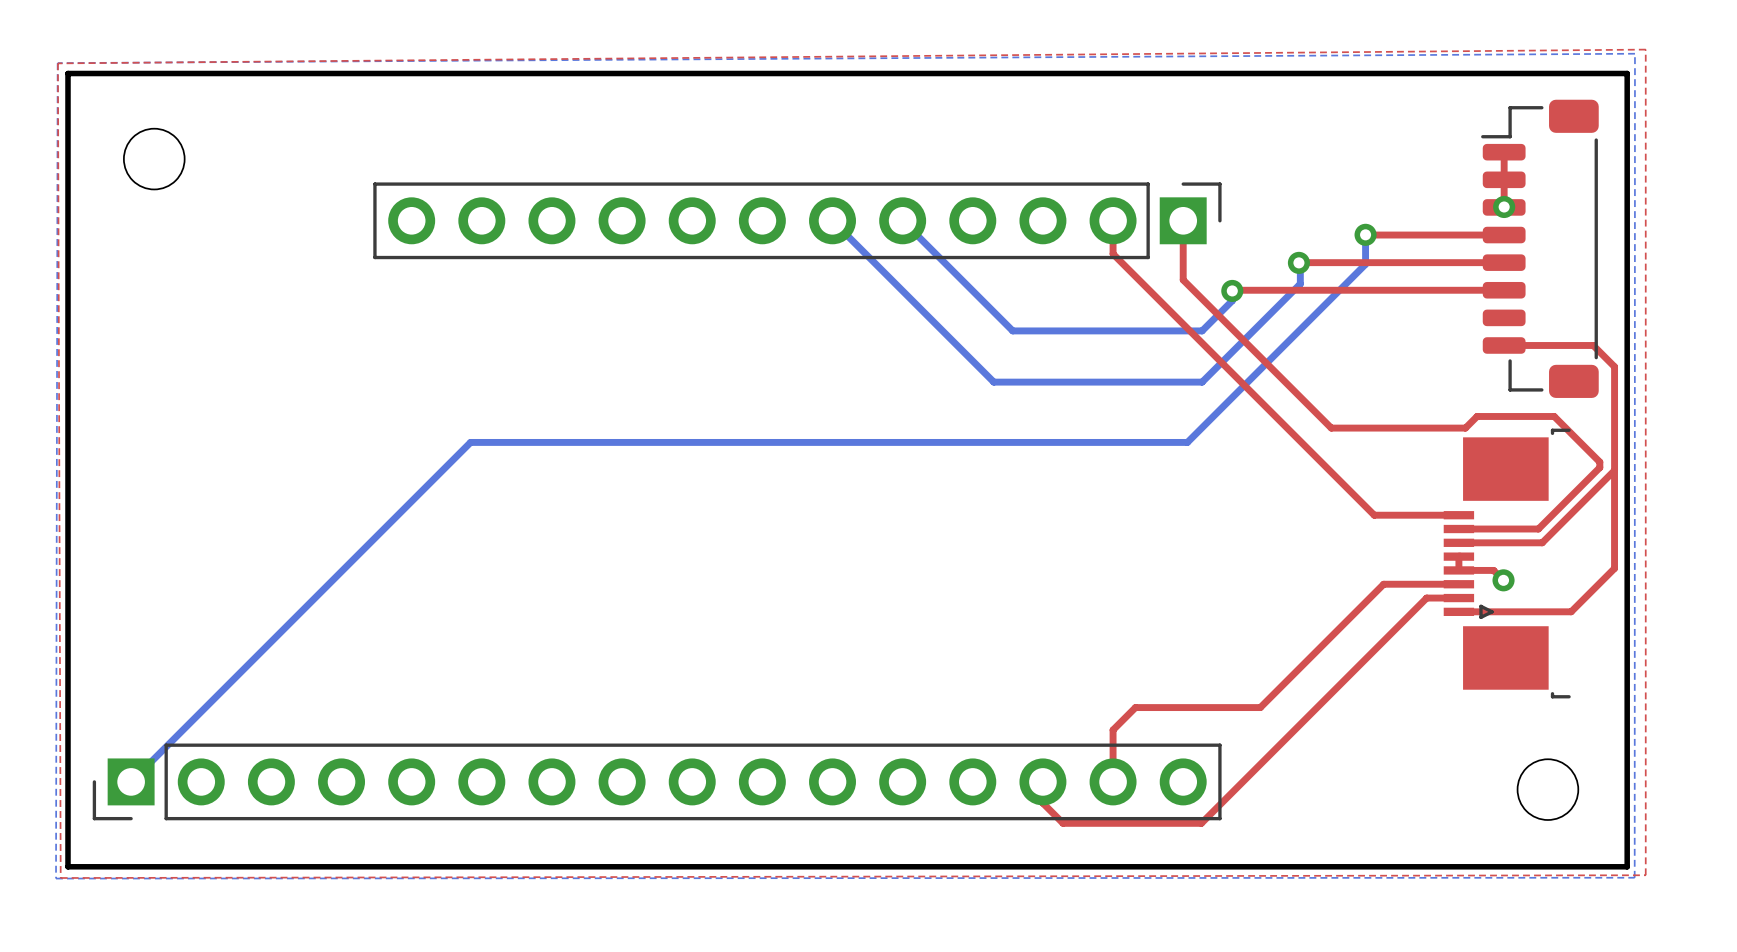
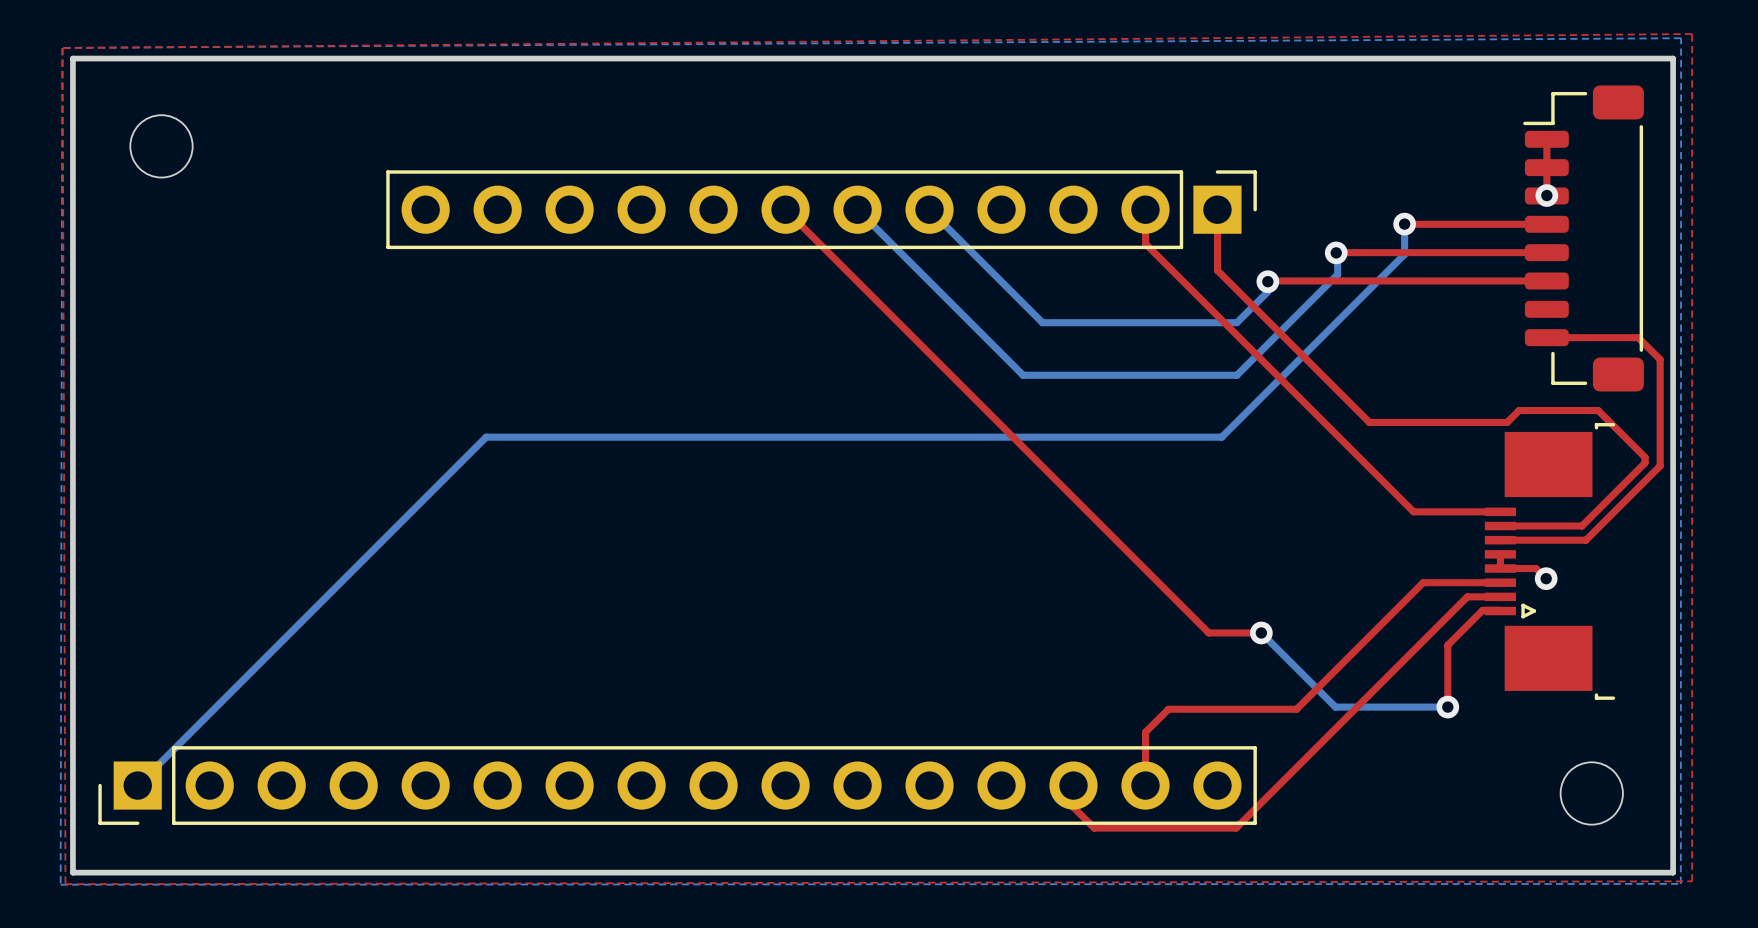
top track: none -> (785, 209) (1208, 632) (1262, 632)
top track: (1614, 470) (1614, 568) (1571, 611) (1458, 611) -> (1447, 707) (1447, 645) (1482, 610) (1500, 611)
bottom track: none -> (1261, 632) (1335, 707) (1447, 707)
via: none -> (1261, 632)
via: none -> (1447, 707)

